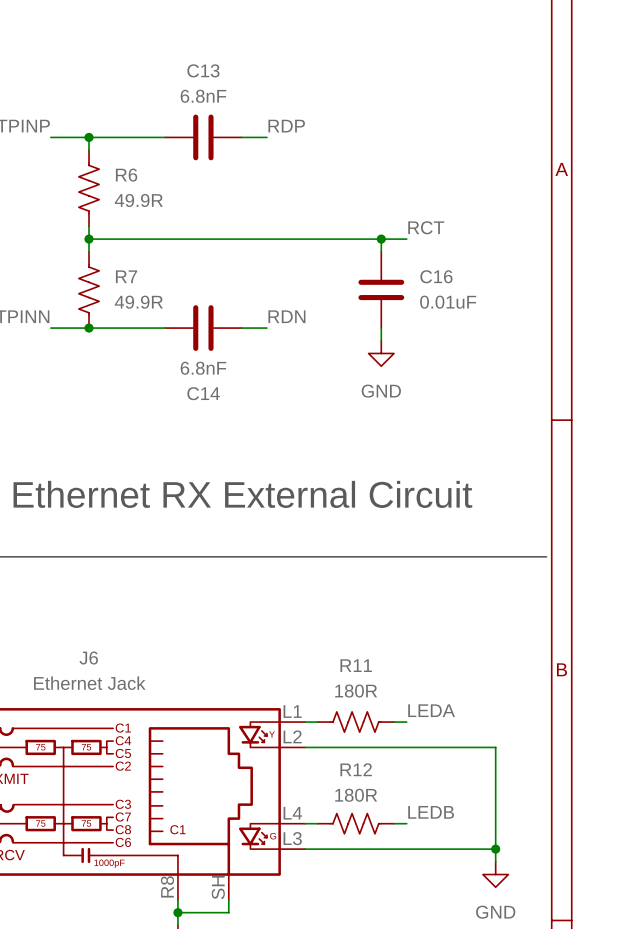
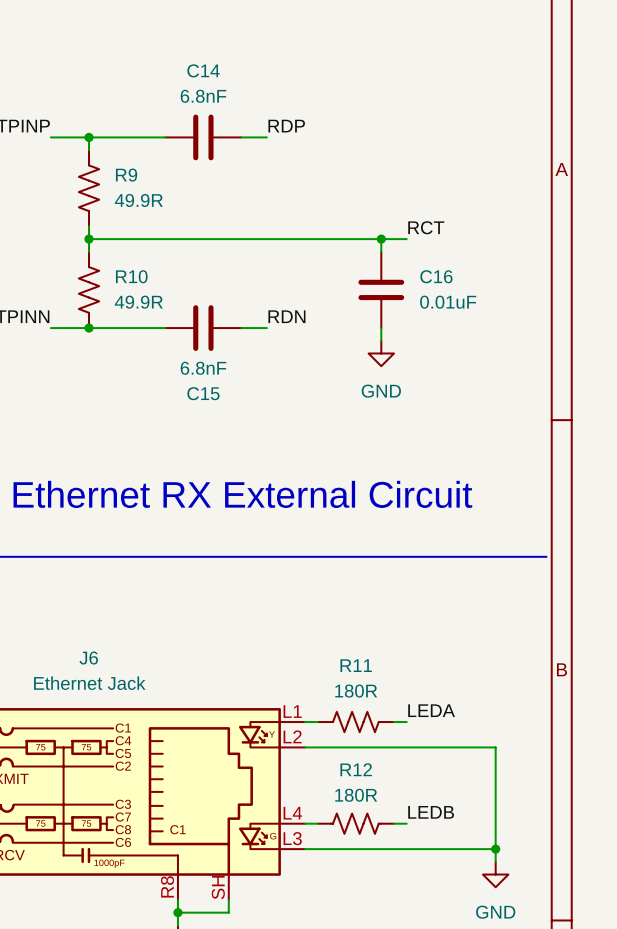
C13 name: C13 (203, 70) -> C14 (203, 70)
R6 name: R6 (126, 175) -> R9 (126, 175)
R7 name: R7 (126, 276) -> R10 (131, 276)
C14 name: C14 (203, 393) -> C15 (203, 393)

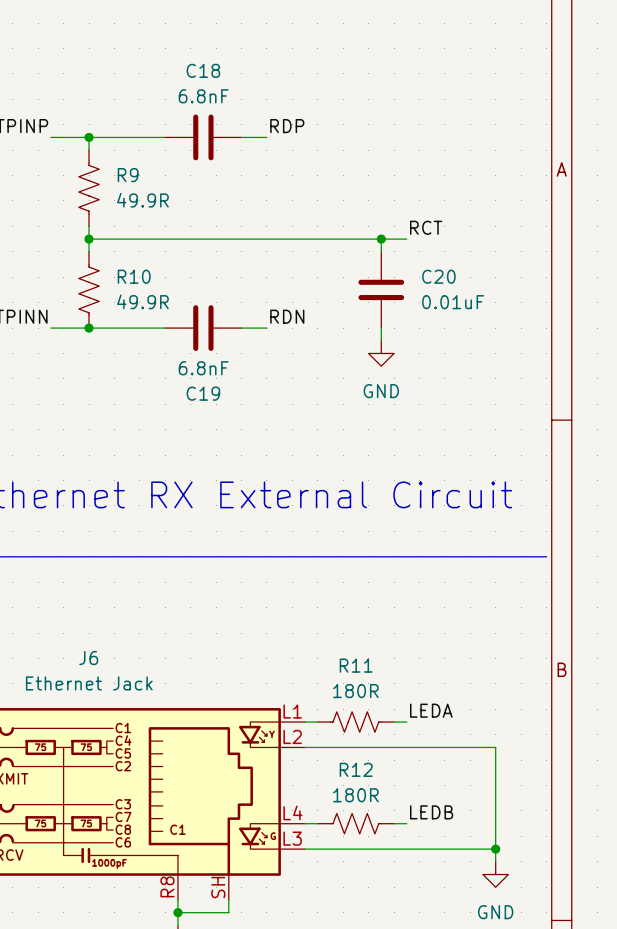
C14 name: C14 (203, 70) -> C18 (203, 70)
C16 name: C16 (436, 276) -> C20 (438, 276)
C15 name: C15 (203, 393) -> C19 (203, 393)

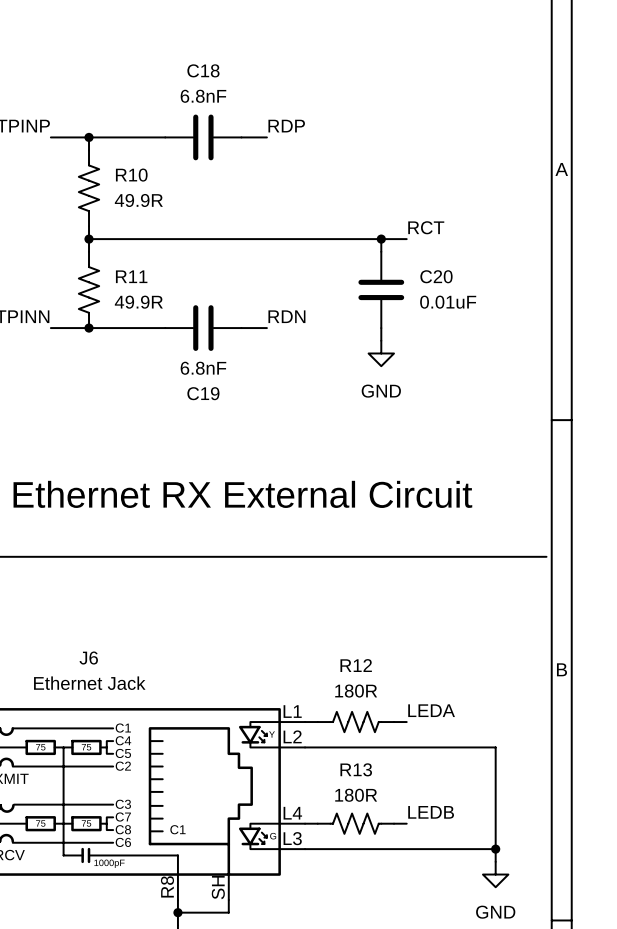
R9 name: R9 (128, 175) -> R10 (131, 175)
R10 name: R10 (134, 276) -> R11 (131, 276)
R11 name: R11 (356, 665) -> R12 (356, 665)
R12 name: R12 (356, 769) -> R13 (356, 769)

